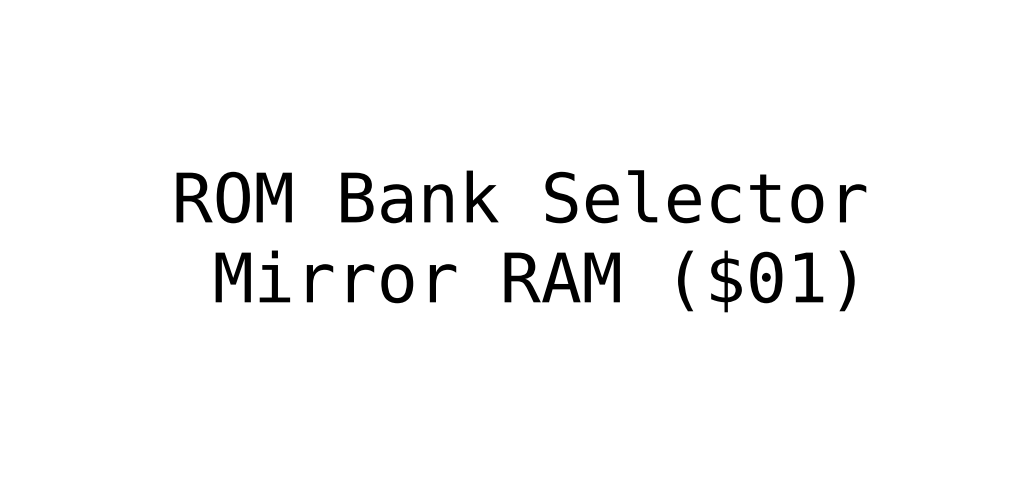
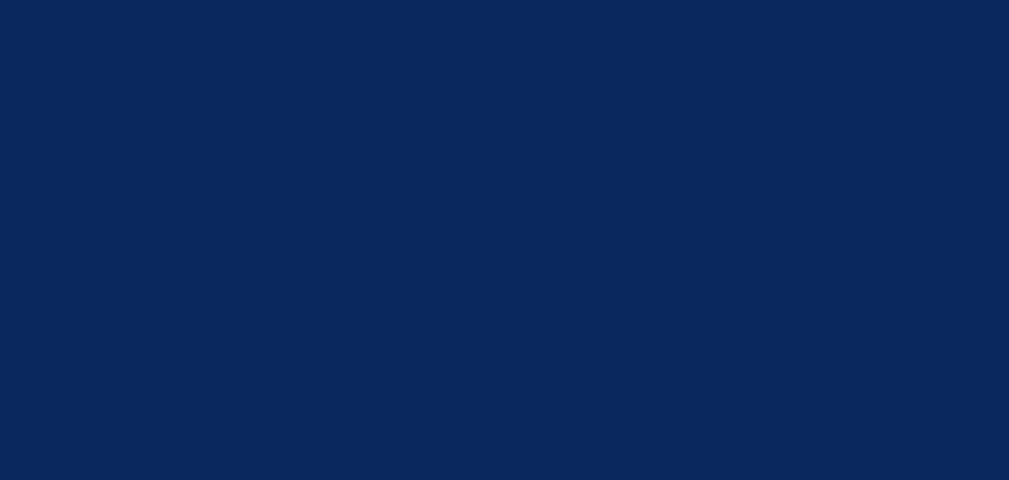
text: ROM Bank Selector (521, 196) -> none
text: Mirror RAM ($01) (535, 281) -> none

